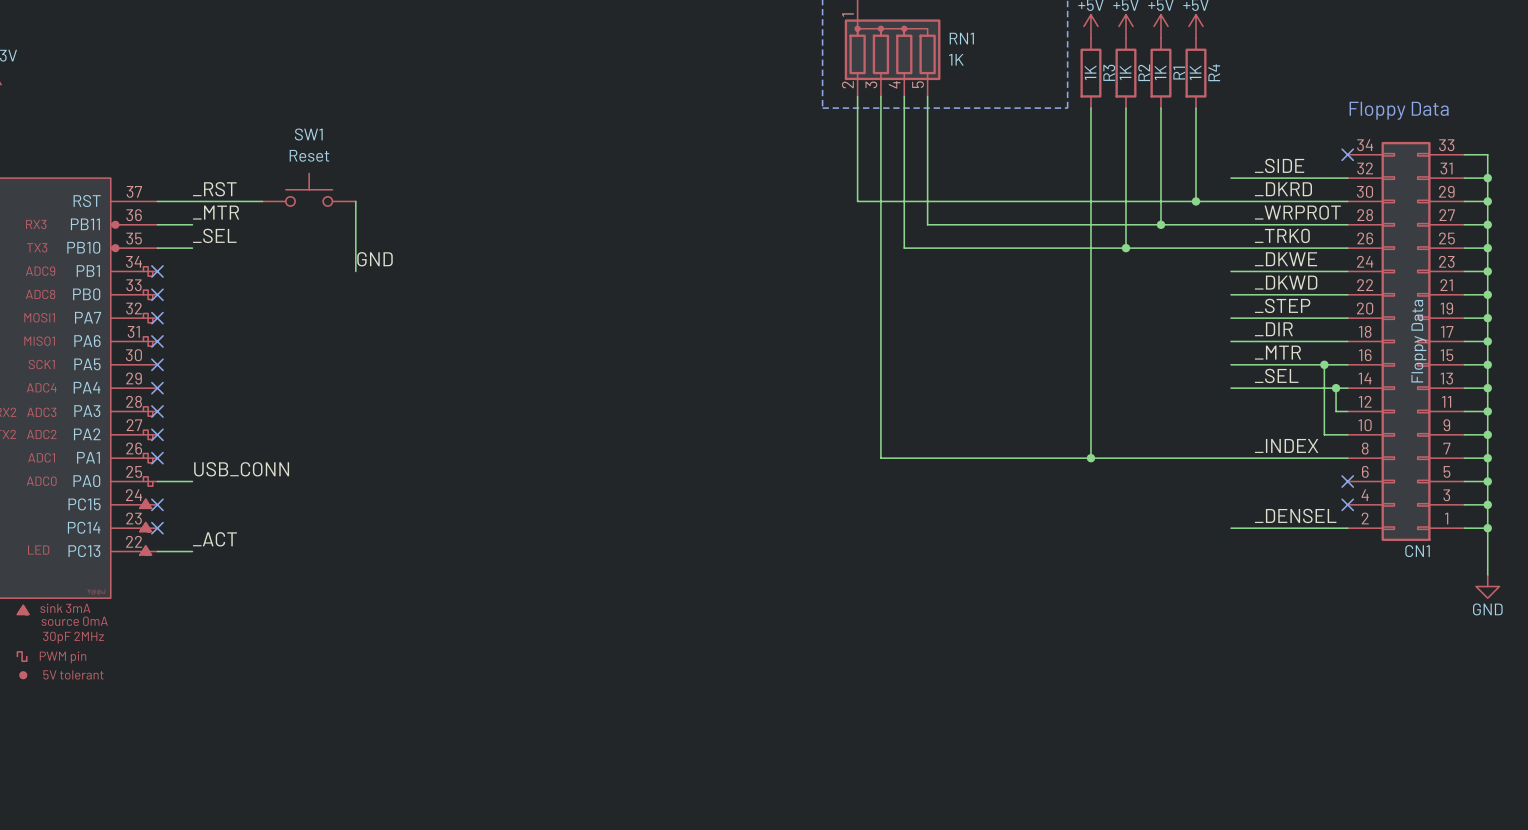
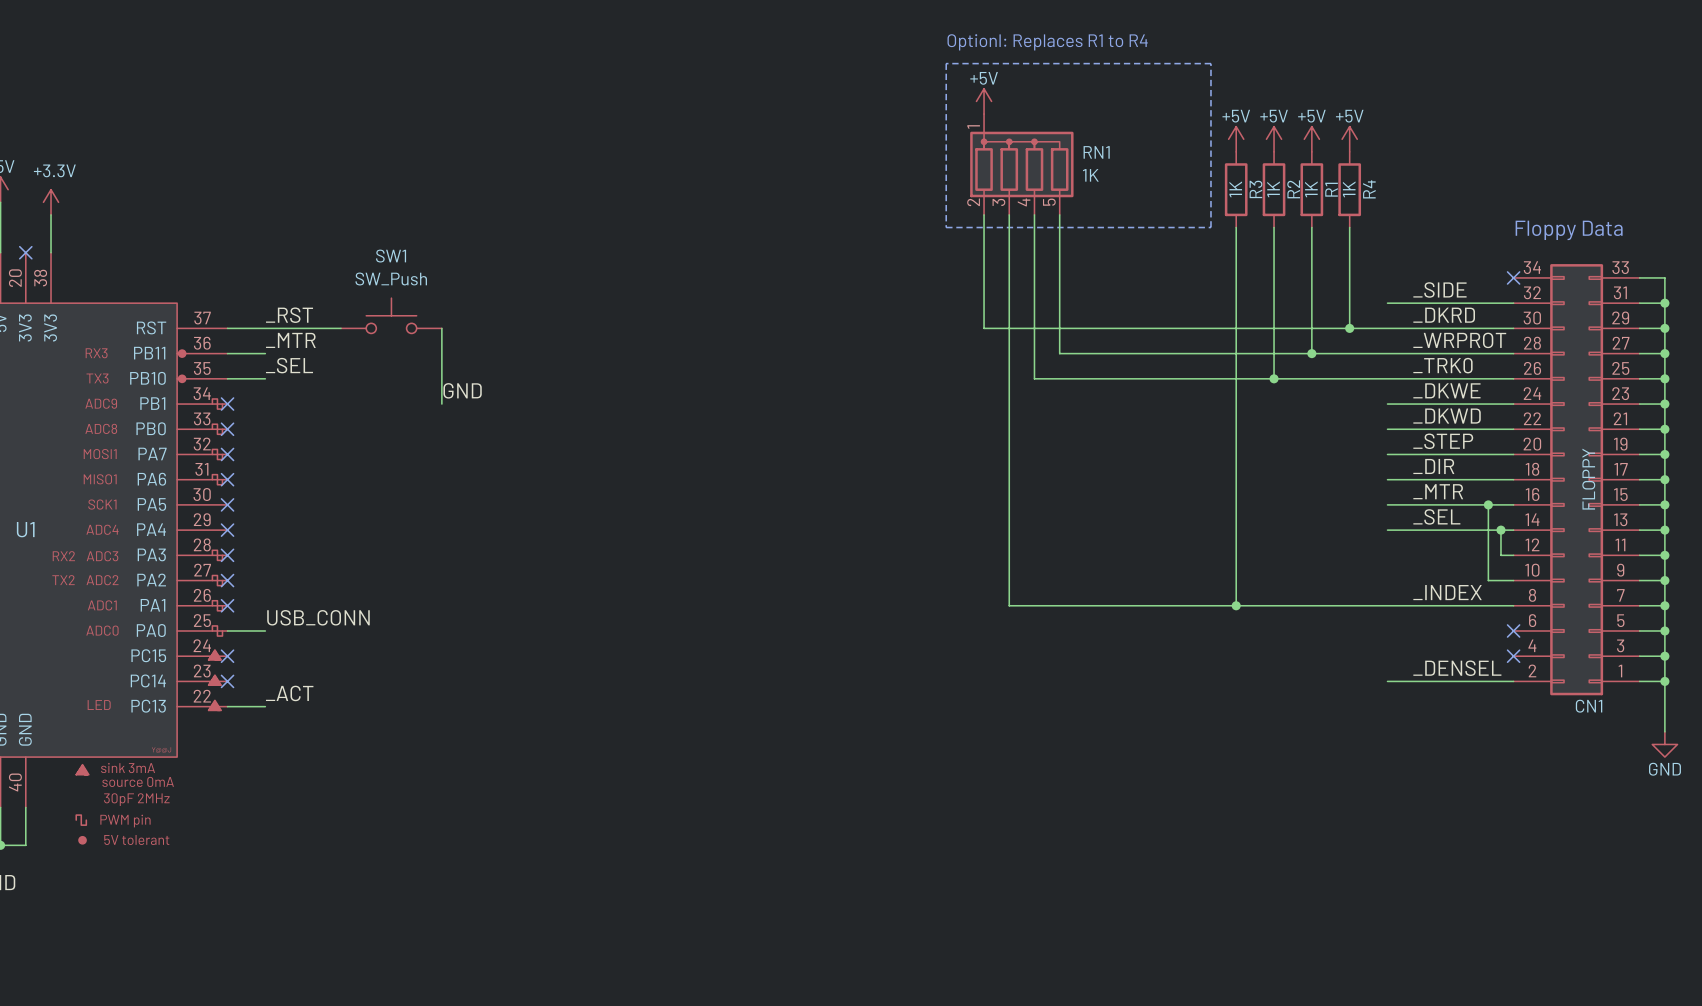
SW1 value: Reset (309, 155) -> SW_Push (391, 279)
CN1 value: Floppy Data (1418, 341) -> FLOPPY (1588, 479)

